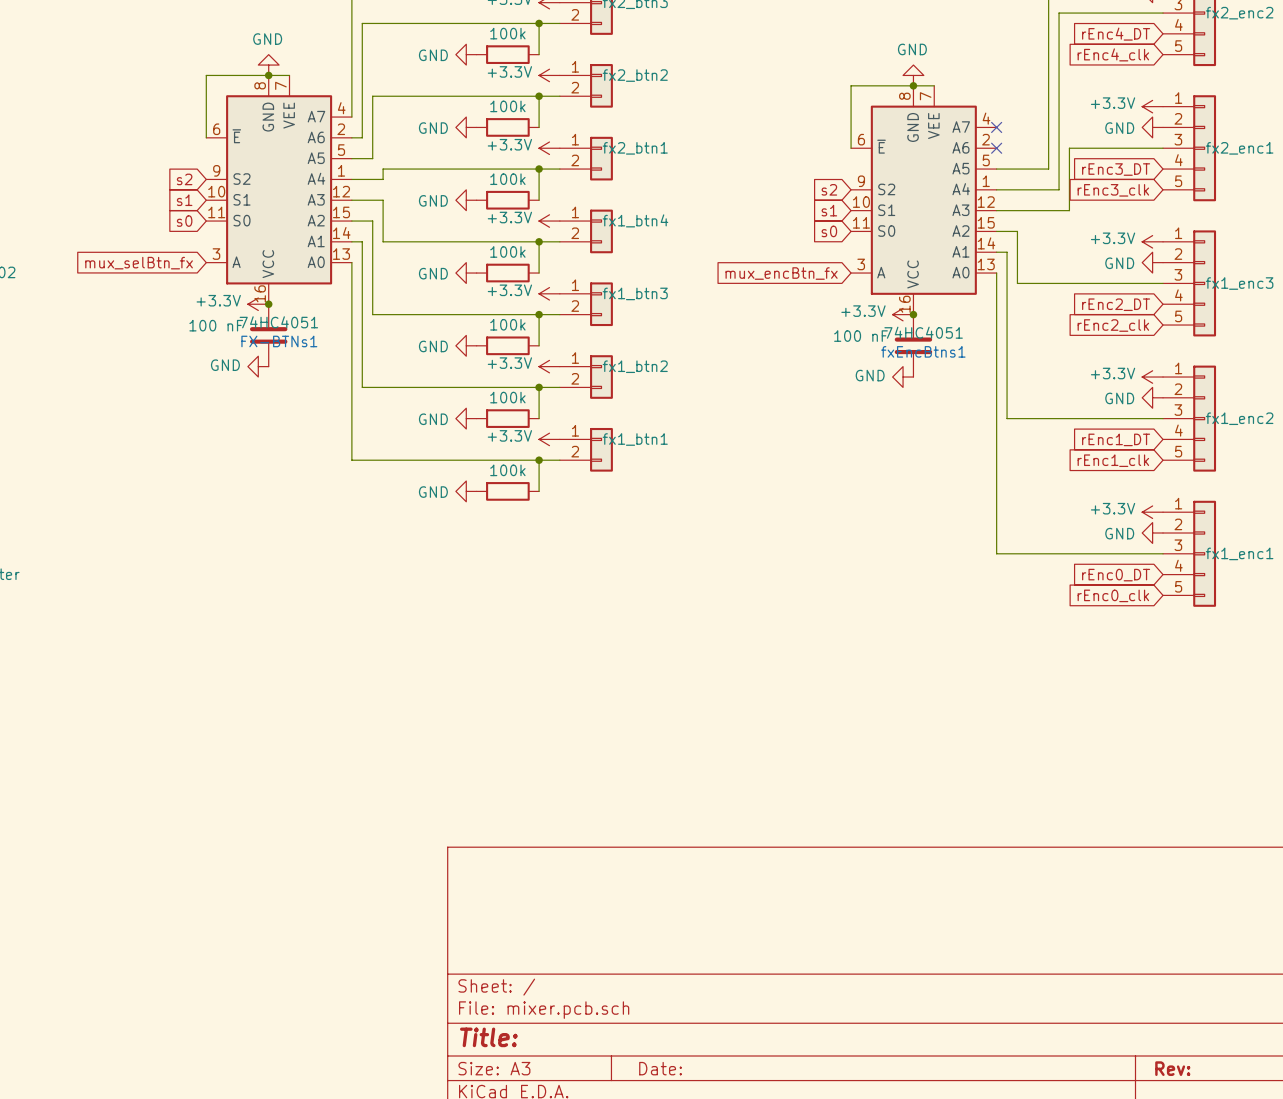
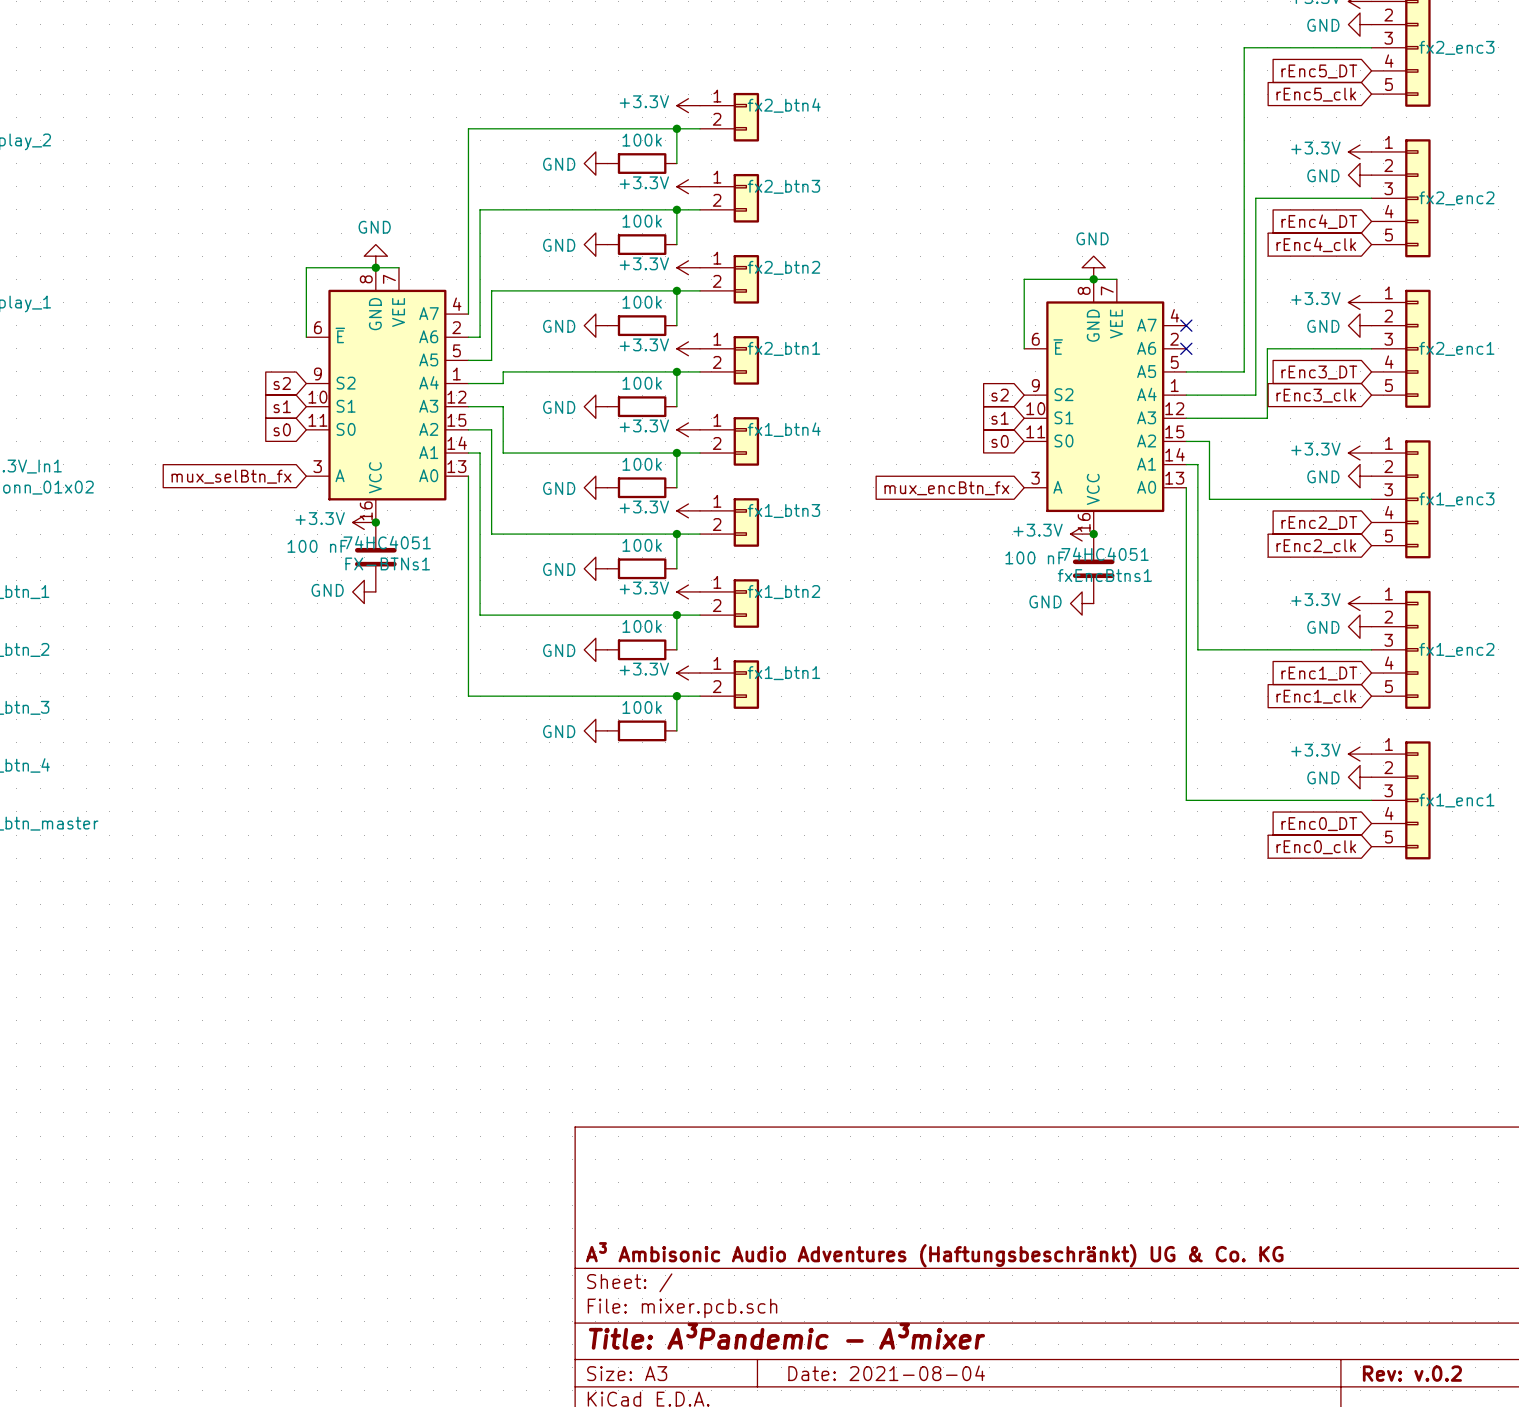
title block: none -> A³ Ambisonic Audio Adventures (Haftungsbeschränkt) UG & Co. KG (934, 1254)
title block: Title: (488, 1037) -> Title: A³Pandemic - A³mixer (786, 1336)
title block: Date: (660, 1068) -> Date: 2021-08-04 (886, 1373)
title block: Rev: (1172, 1068) -> Rev: v.0.2 (1412, 1373)

